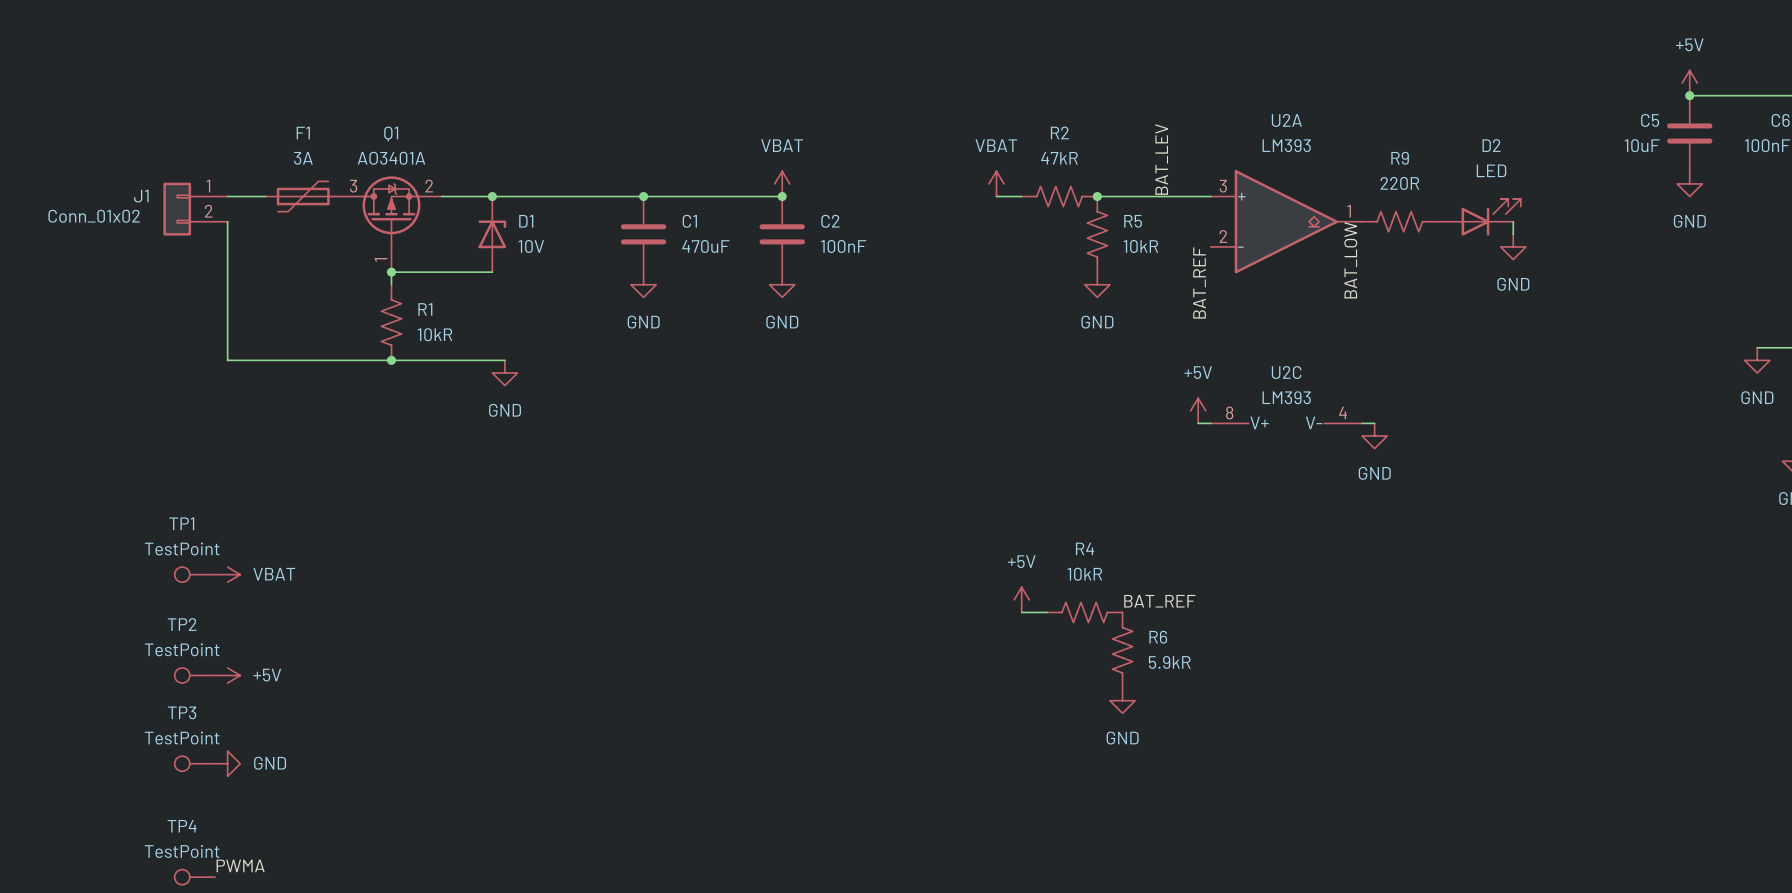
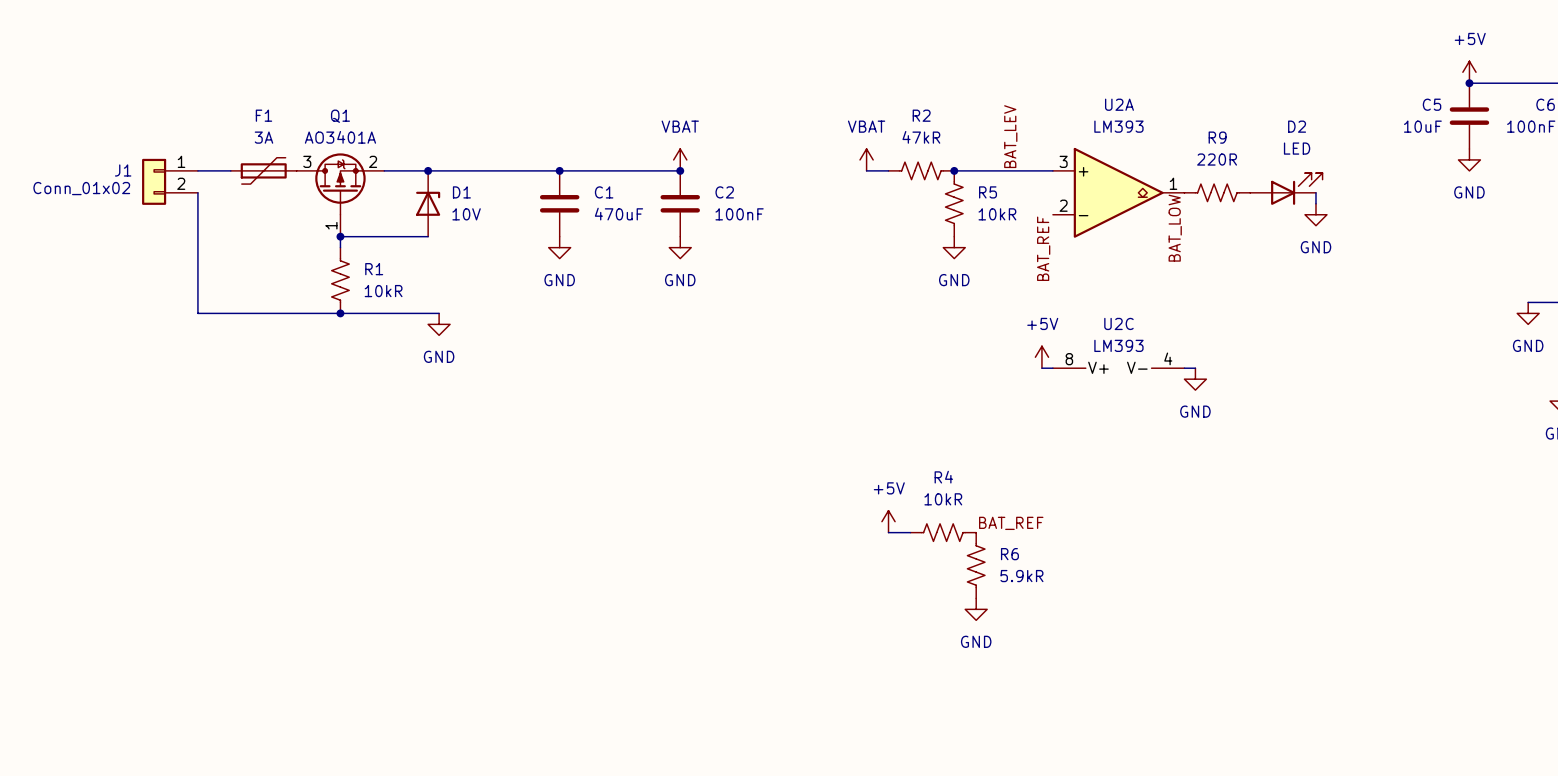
TP1: TestPoint (194, 574) -> none
power symbol: VBAT (227, 574) -> none
TP2: TestPoint (194, 675) -> none
power symbol: +5V (227, 675) -> none
TP3: TestPoint (194, 763) -> none
power symbol: GND (227, 763) -> none
label: PWMA (240, 865) -> none
TP4: TestPoint (194, 877) -> none

